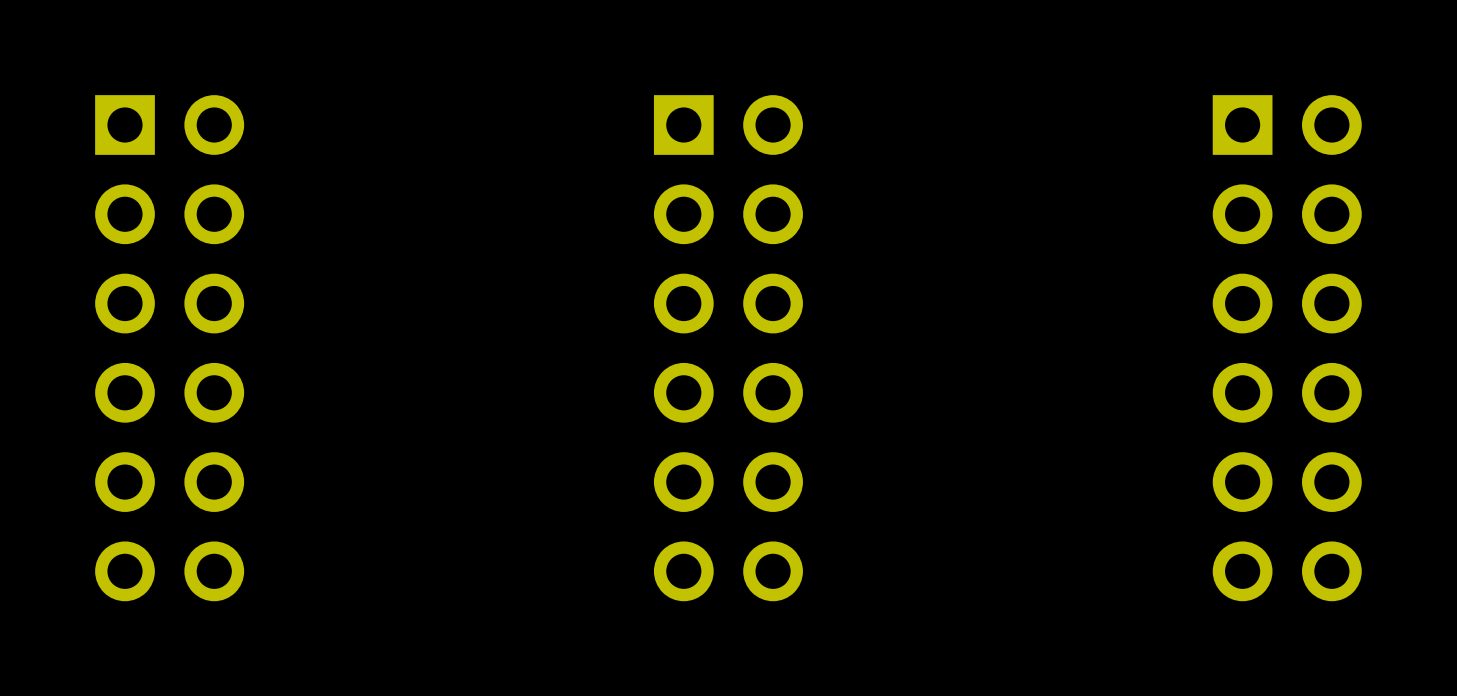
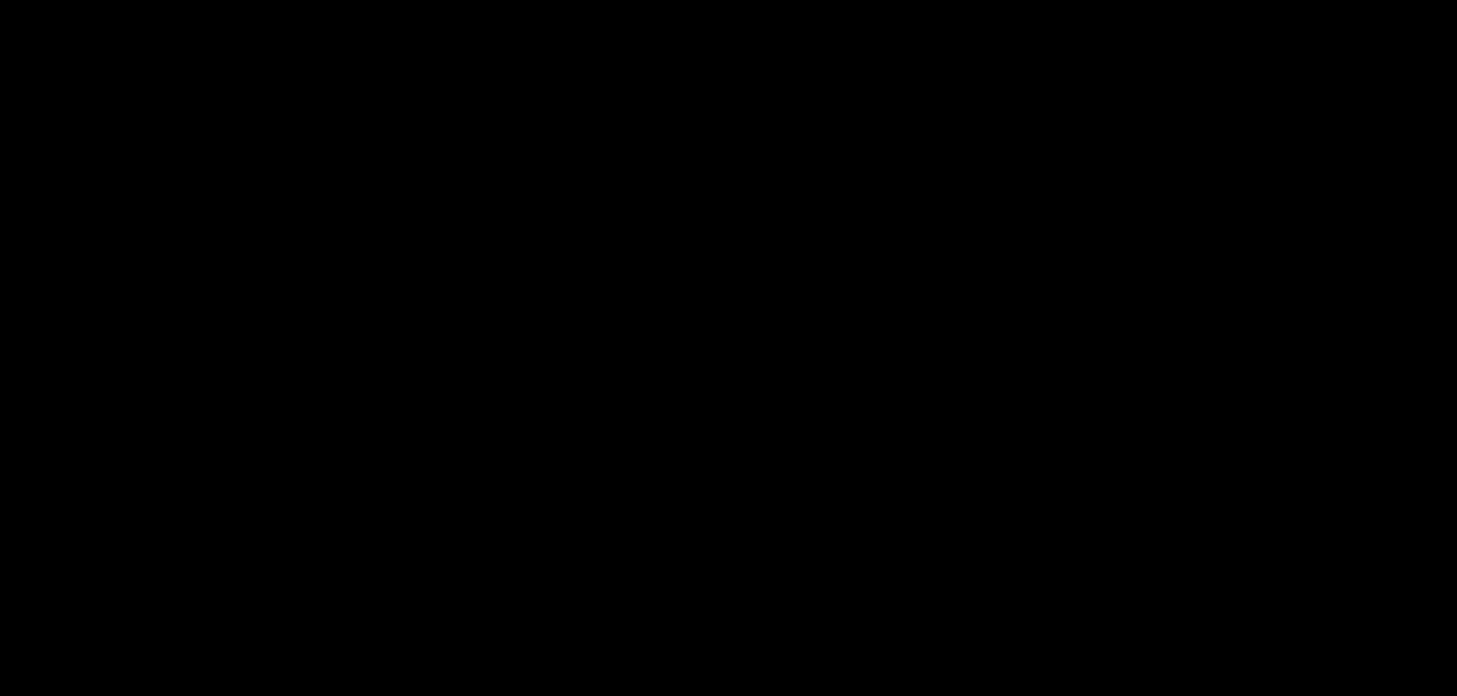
part: (169, 348) -> none
part: (728, 348) -> none
part: (1287, 348) -> none

